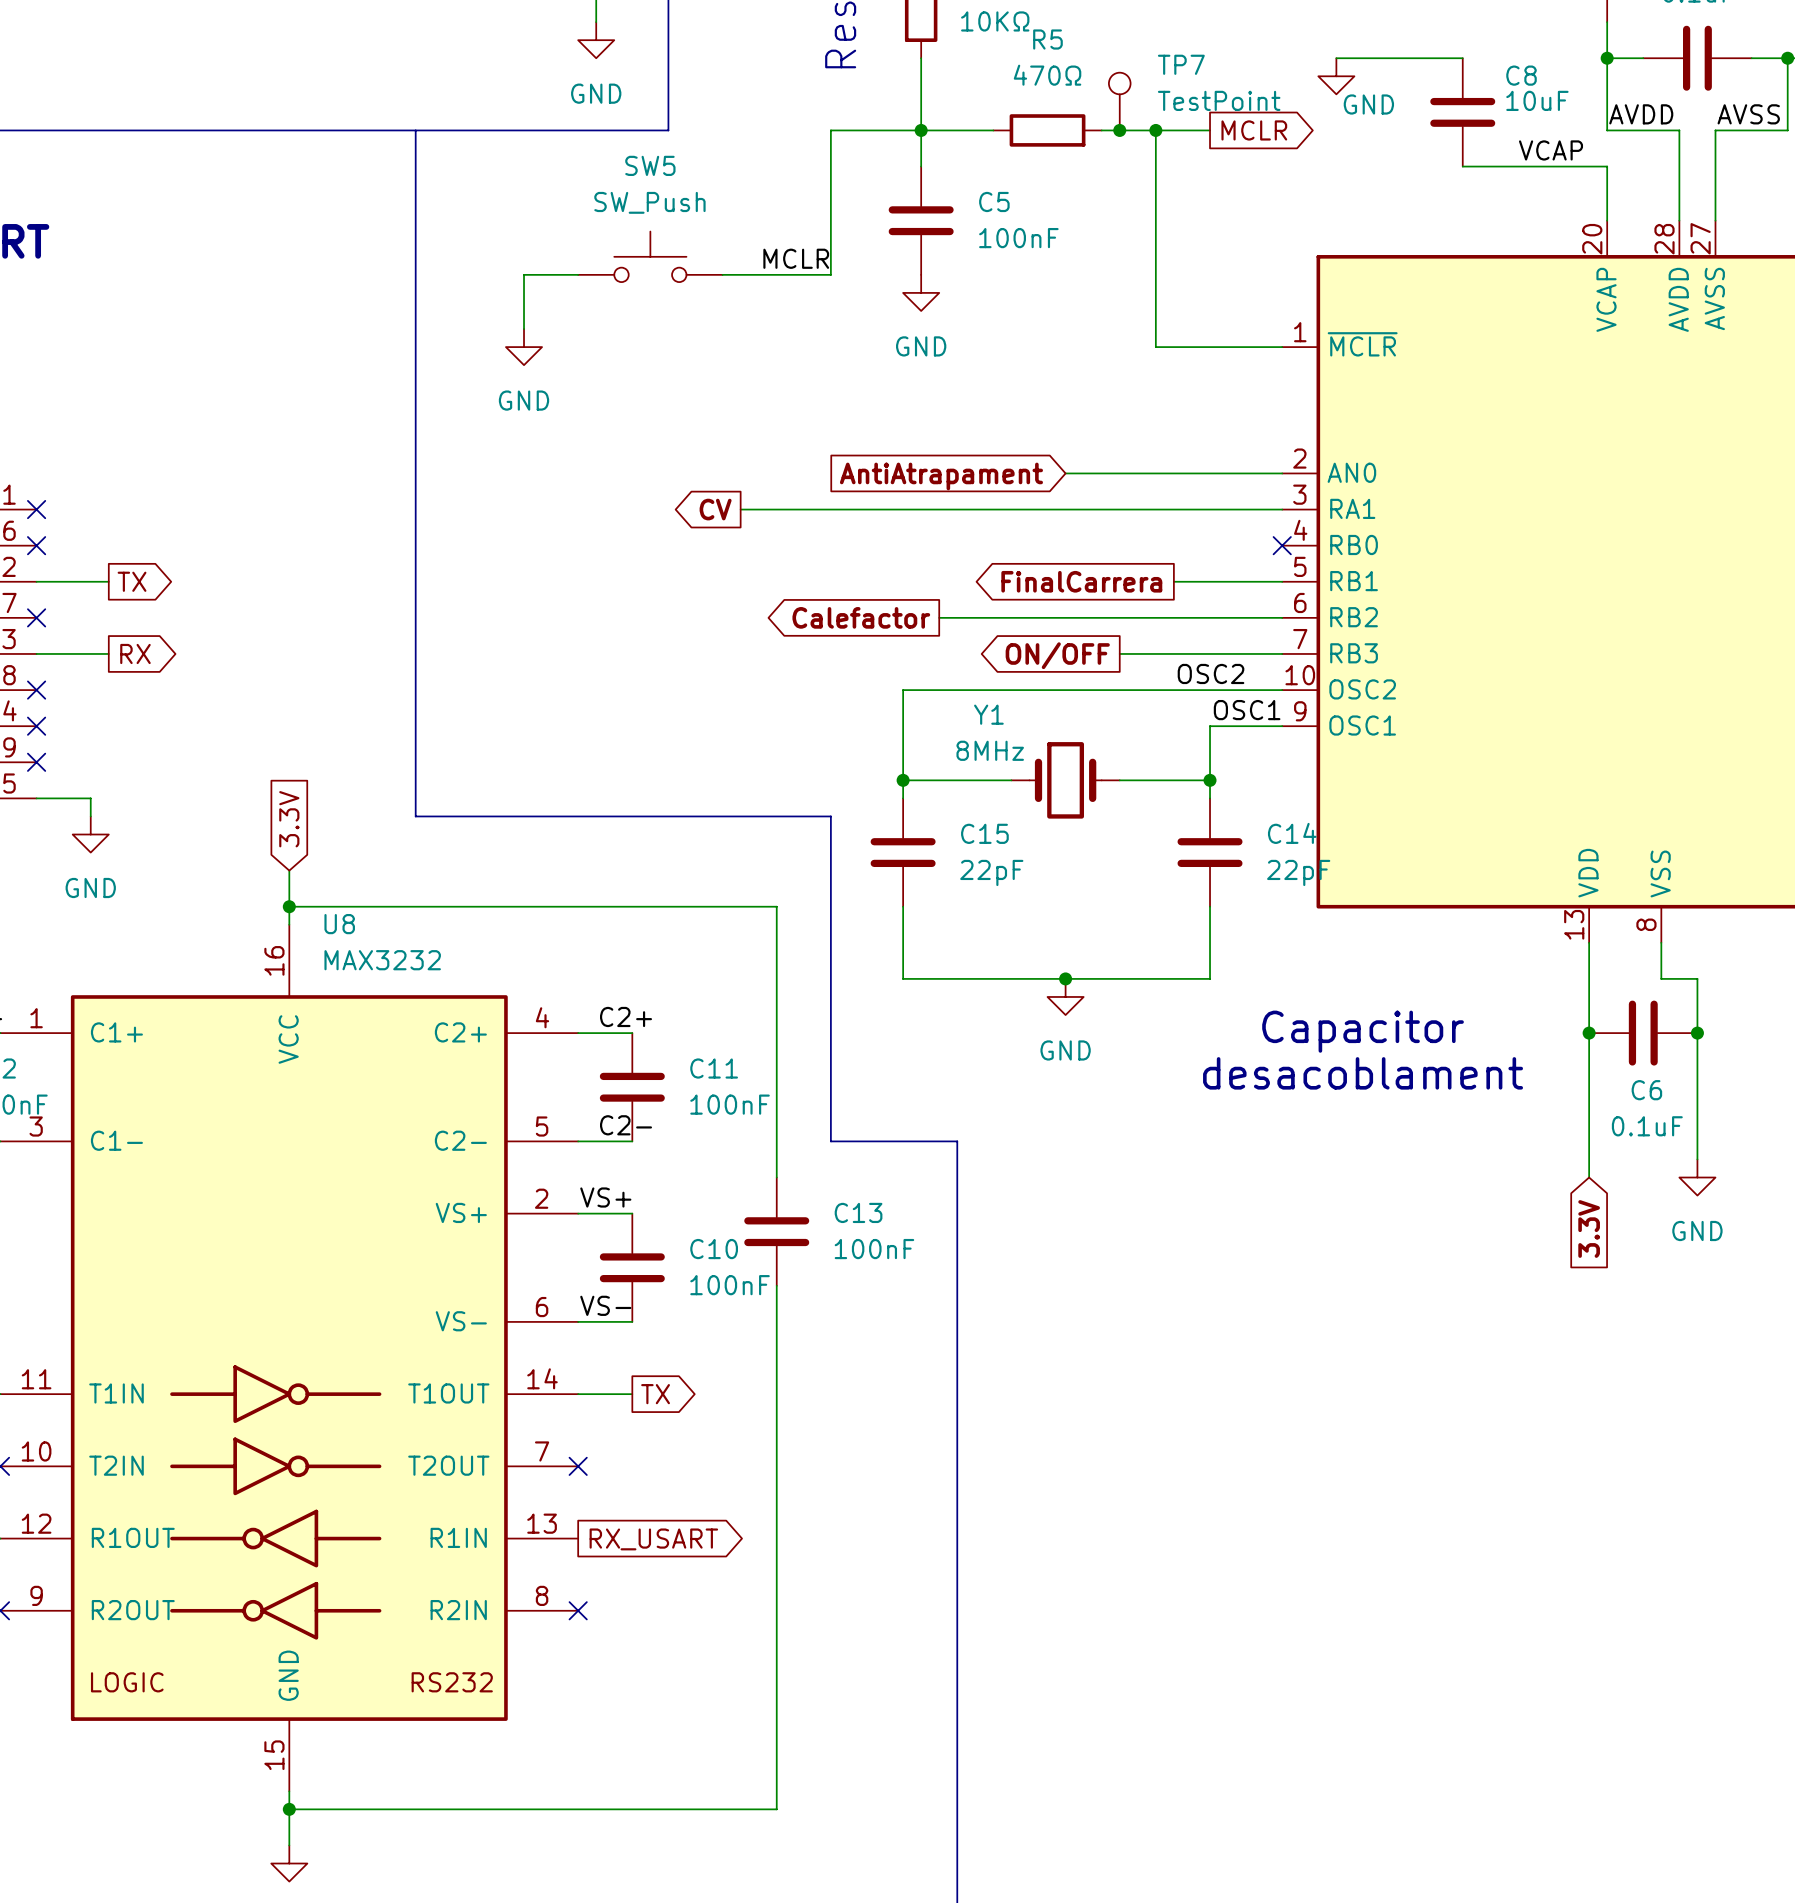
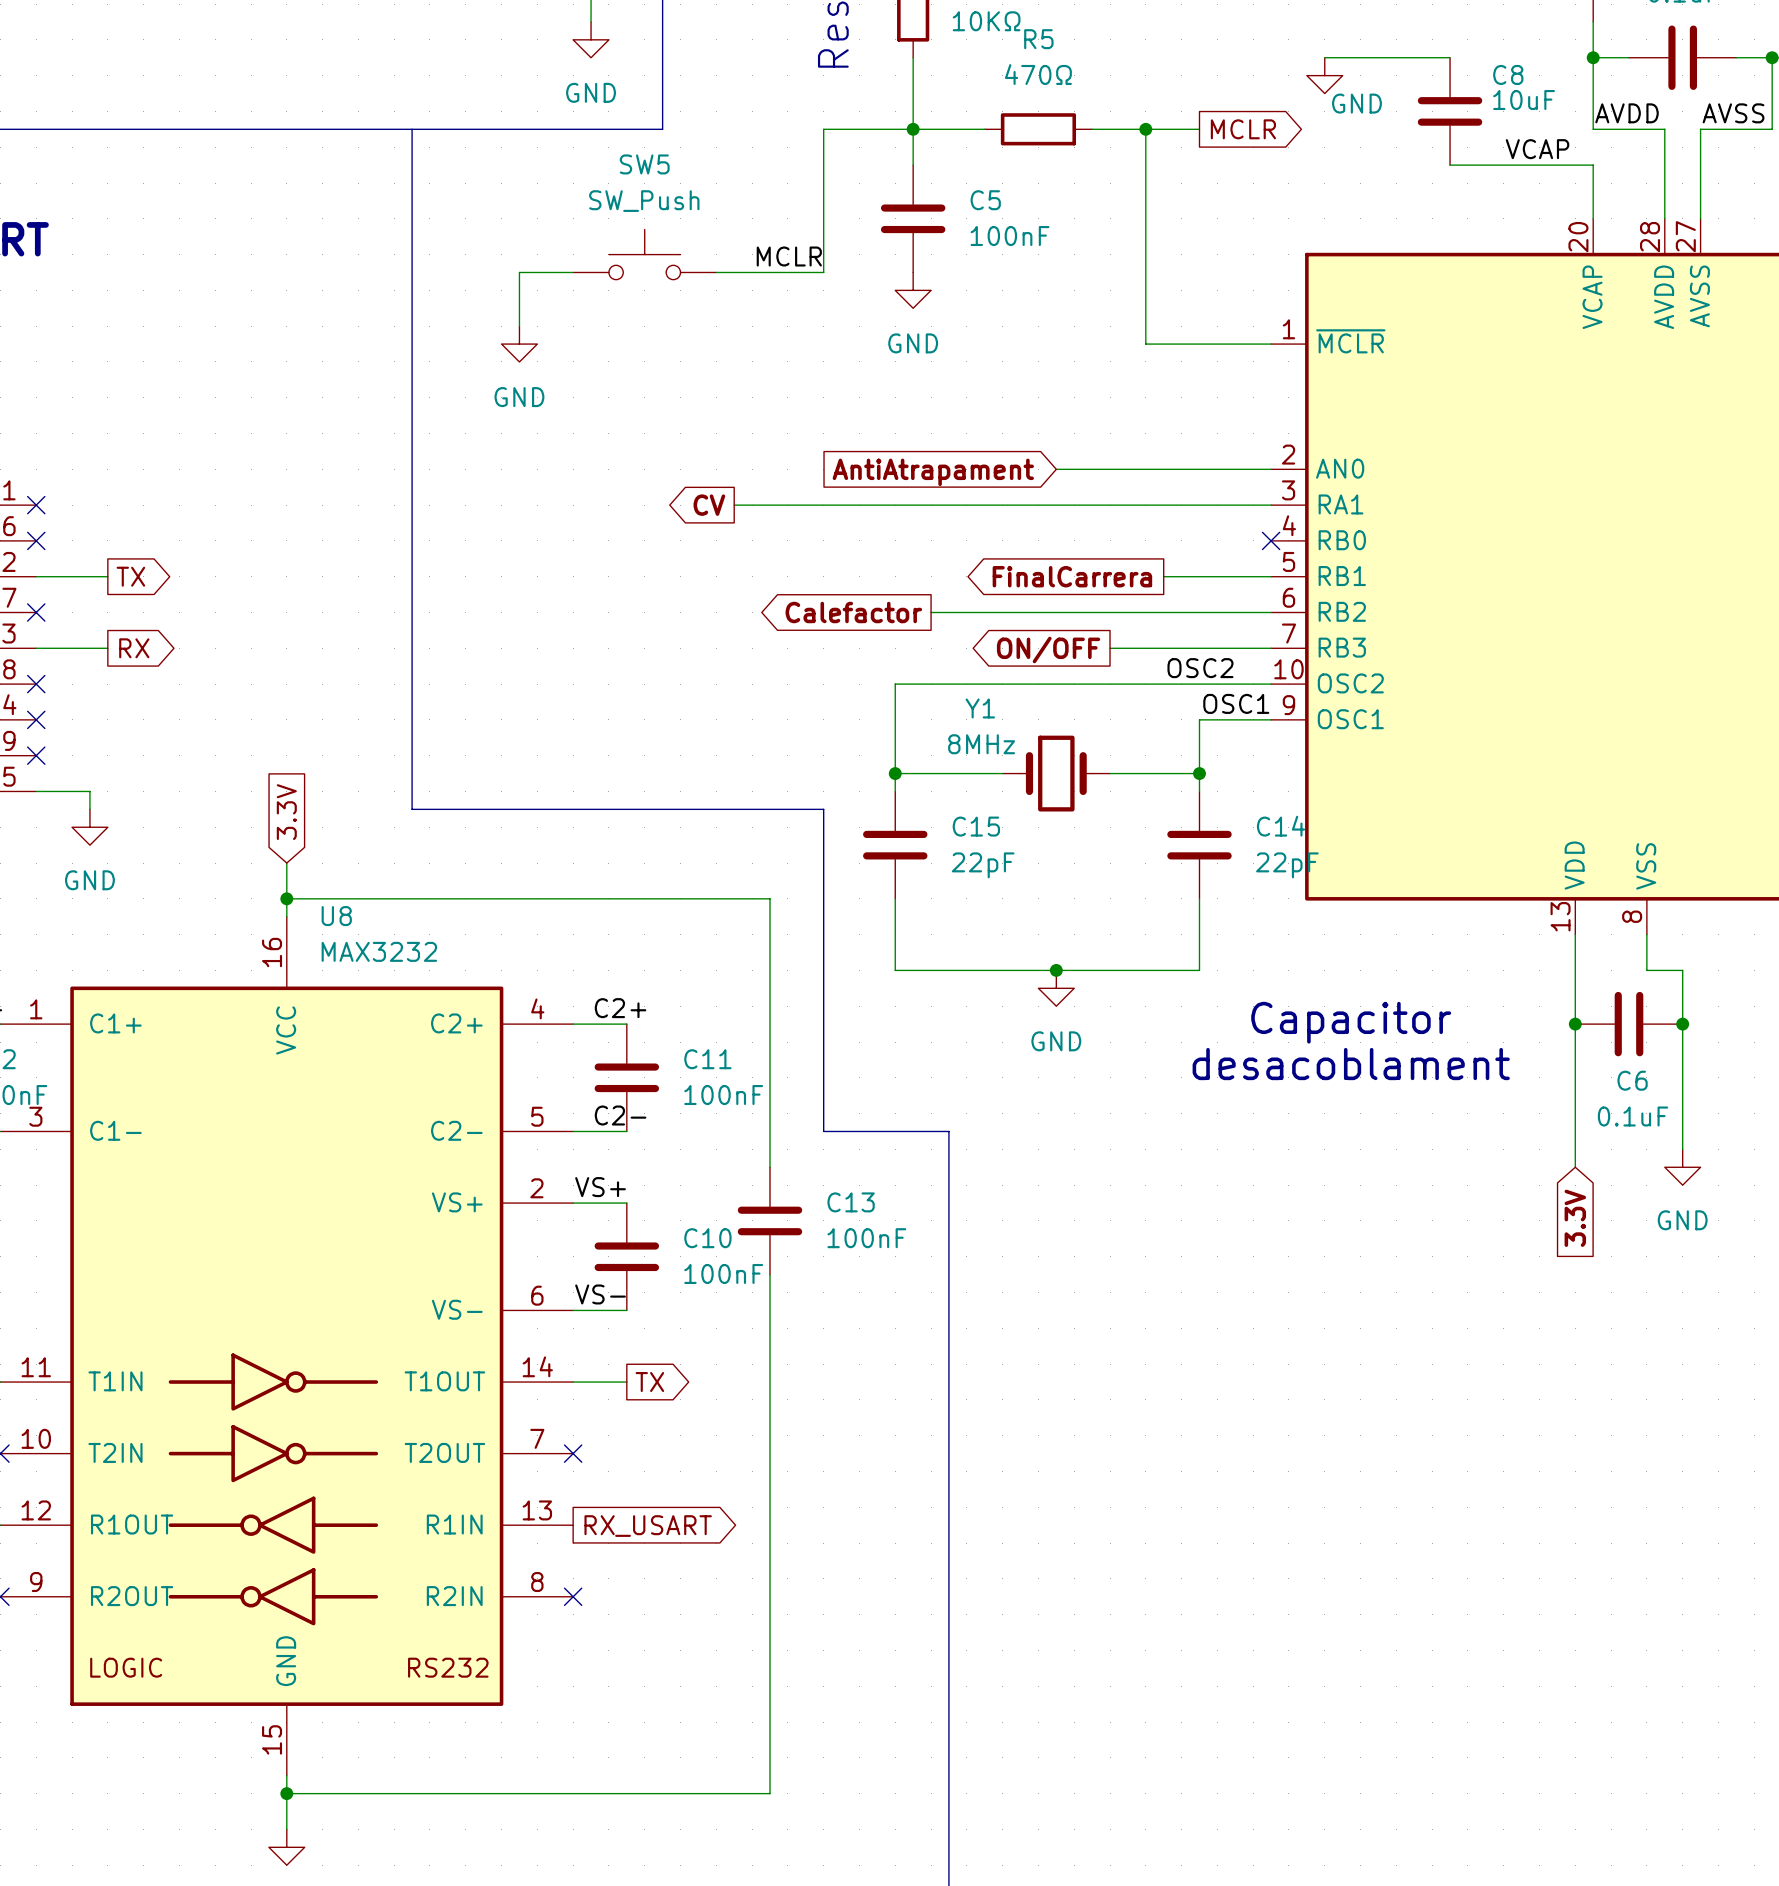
TP7: TestPoint (1119, 101) -> none
junction: (1119, 130) -> none

